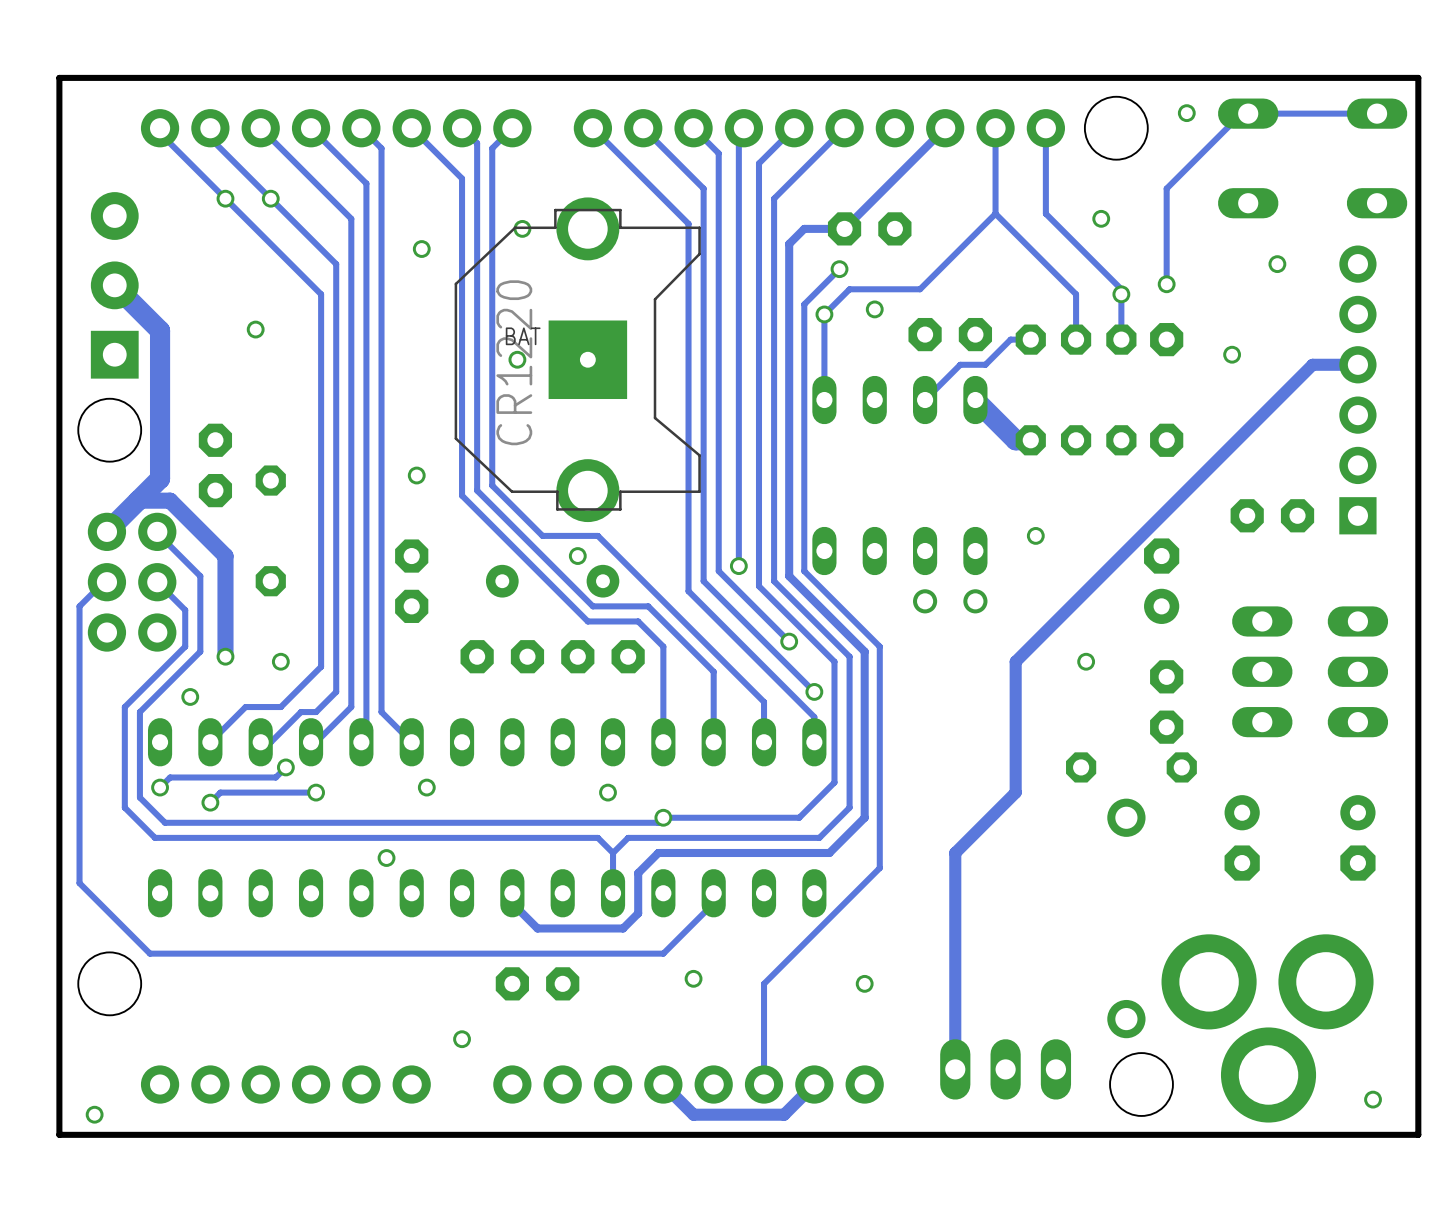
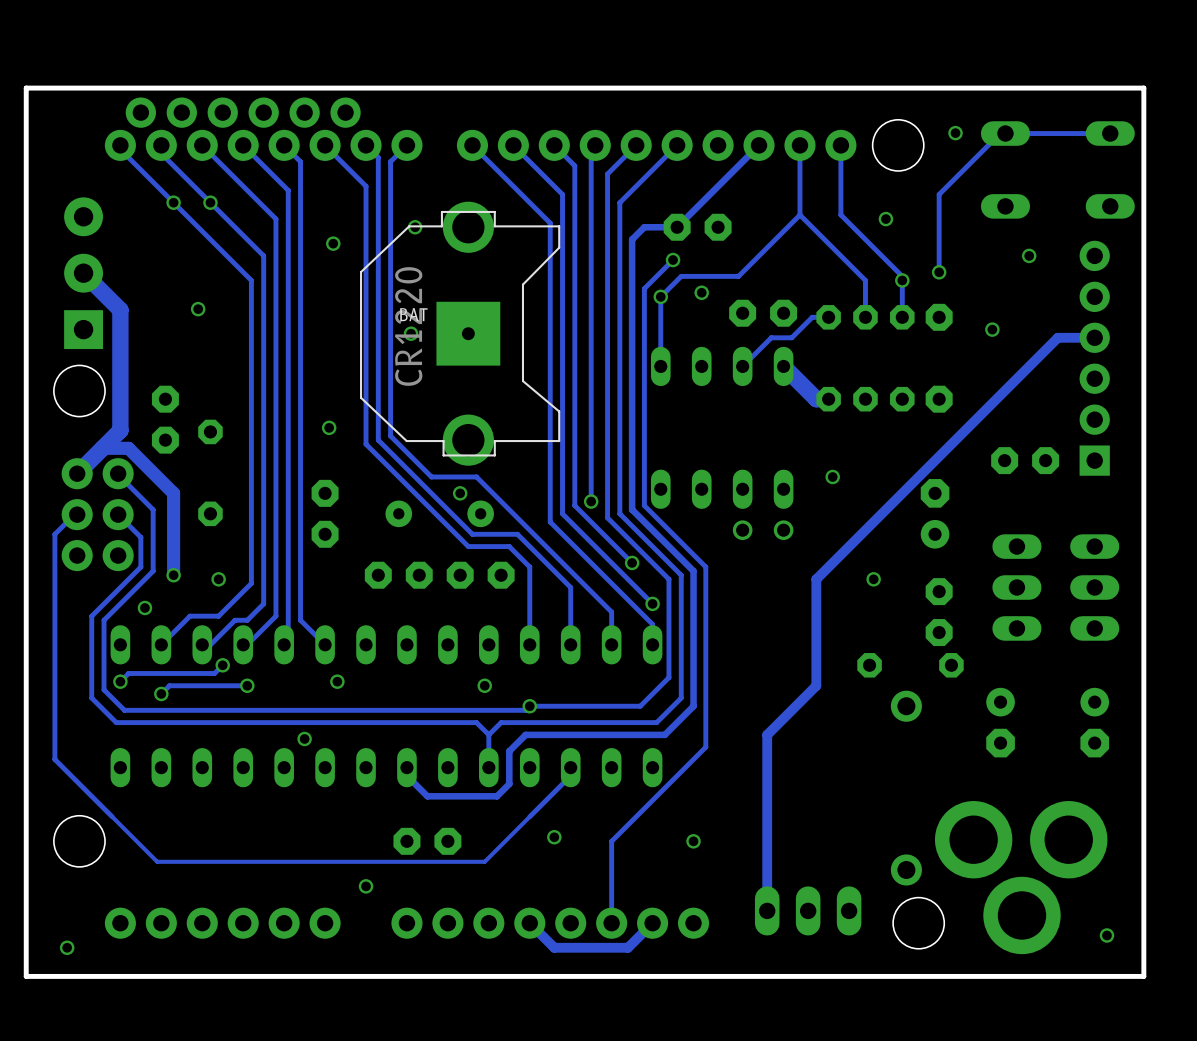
board edge: (1418, 77) (59, 77) (59, 1134) (1418, 1134) -> (1143, 104) (1143, 88) (26, 88) (26, 976) (1143, 976) (1143, 964)
part: none -> (243, 112)
track: (663, 953) (149, 953) -> (529, 816) (484, 861) (157, 861) (112, 816)

